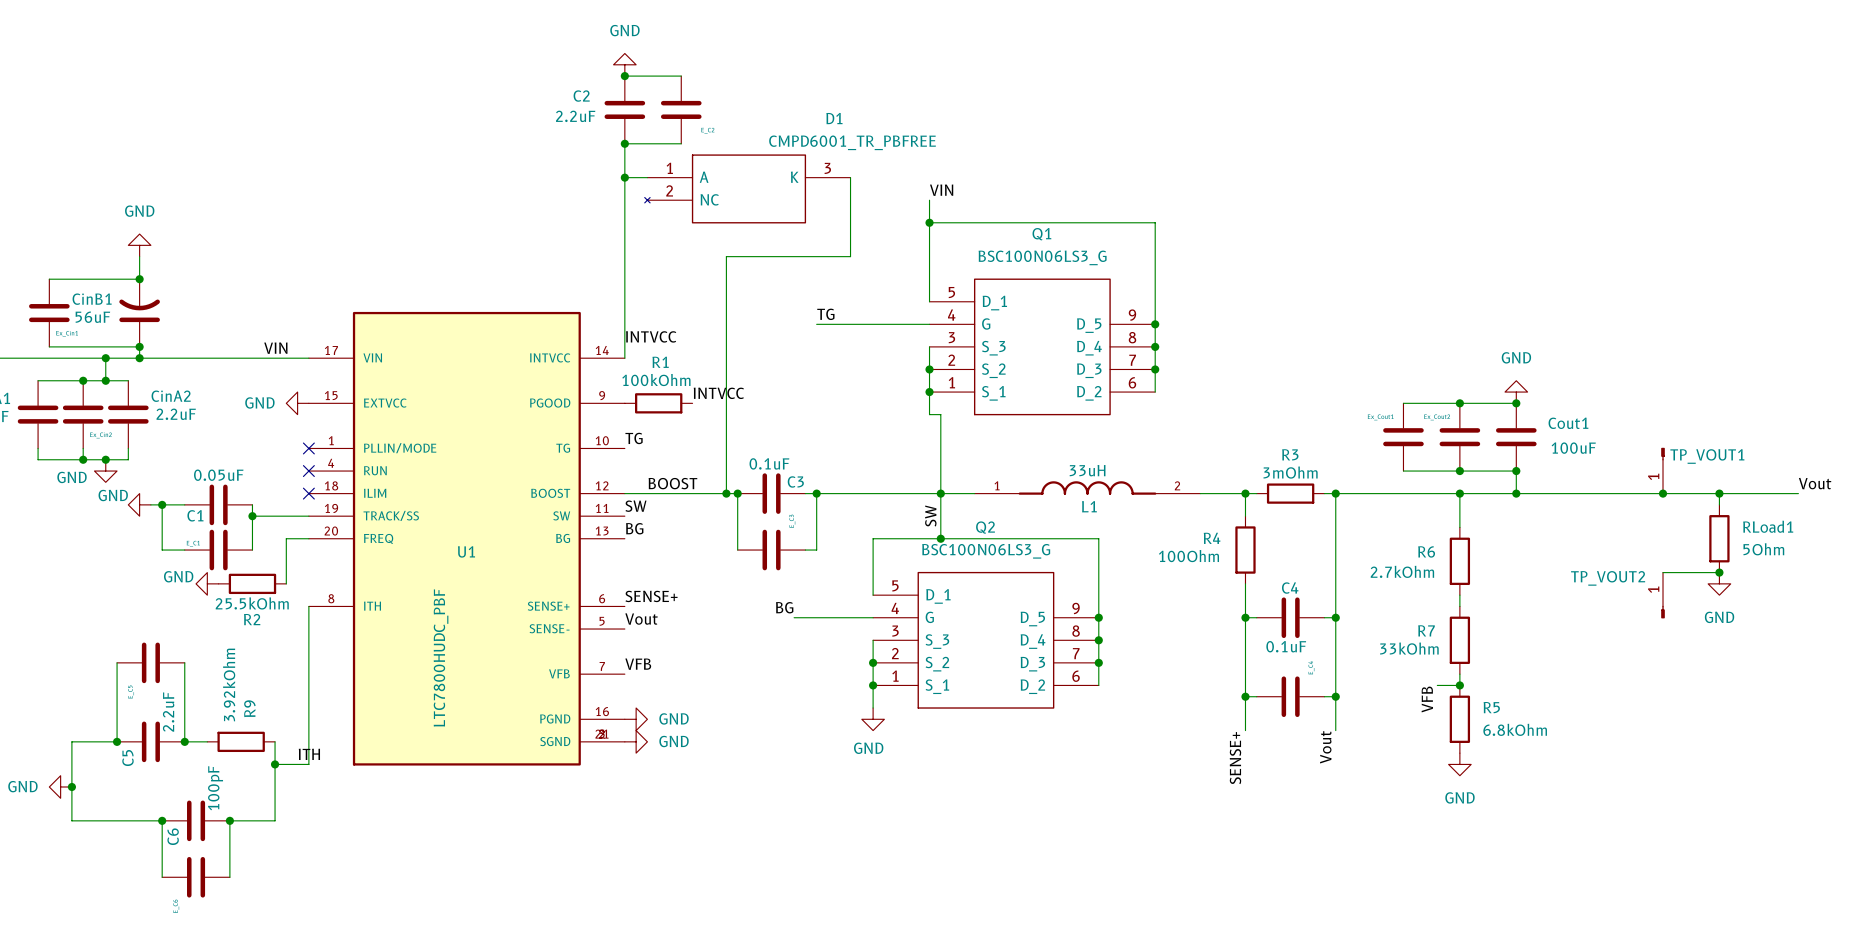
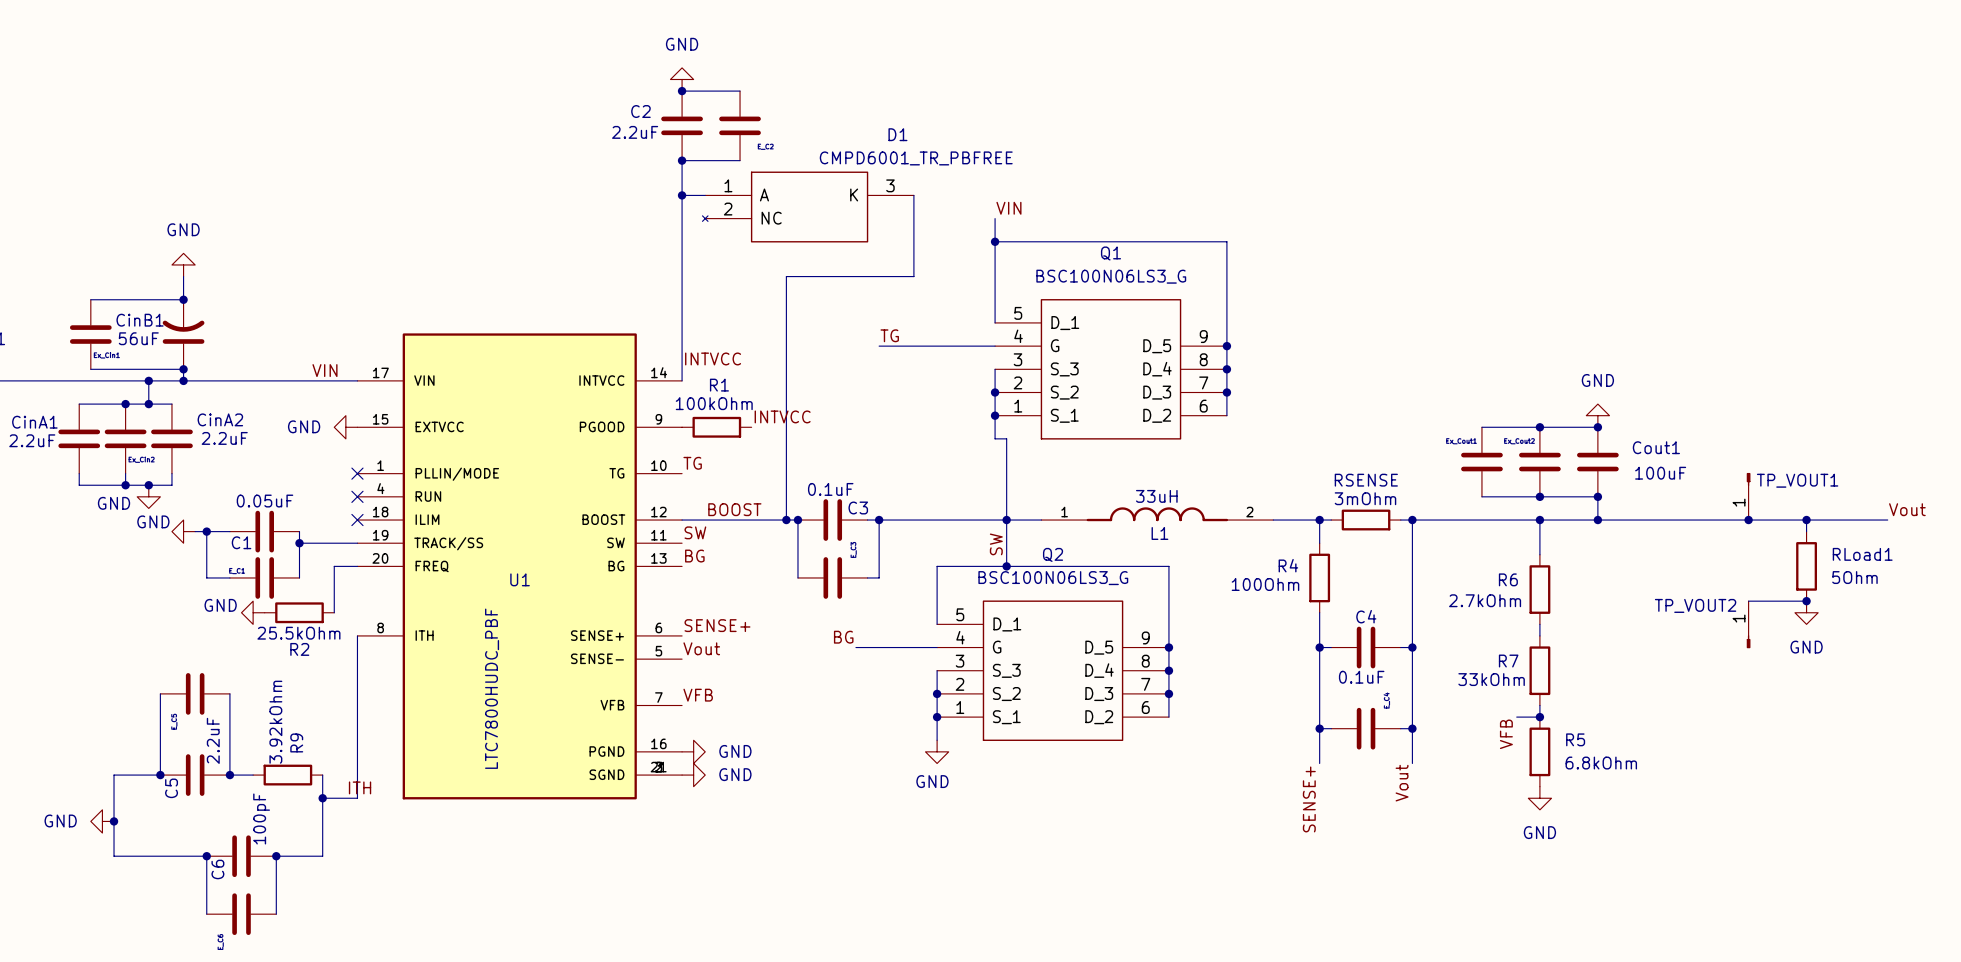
R3 name: R3 (1290, 454) -> RSENSE (1366, 480)

